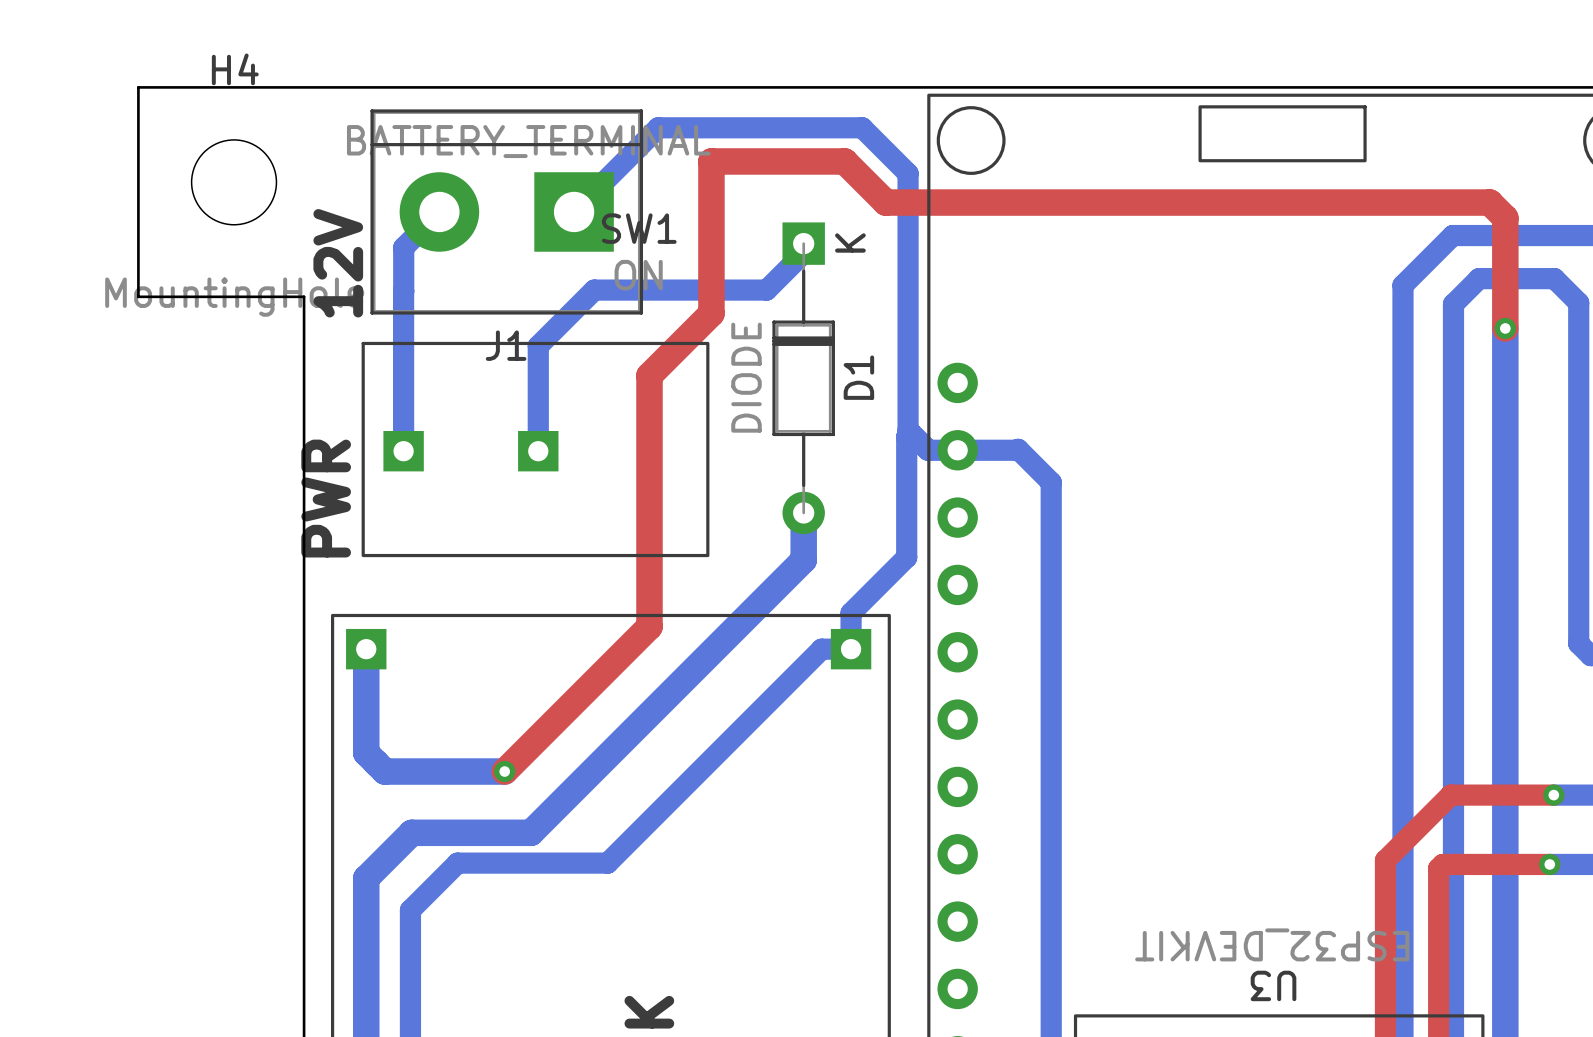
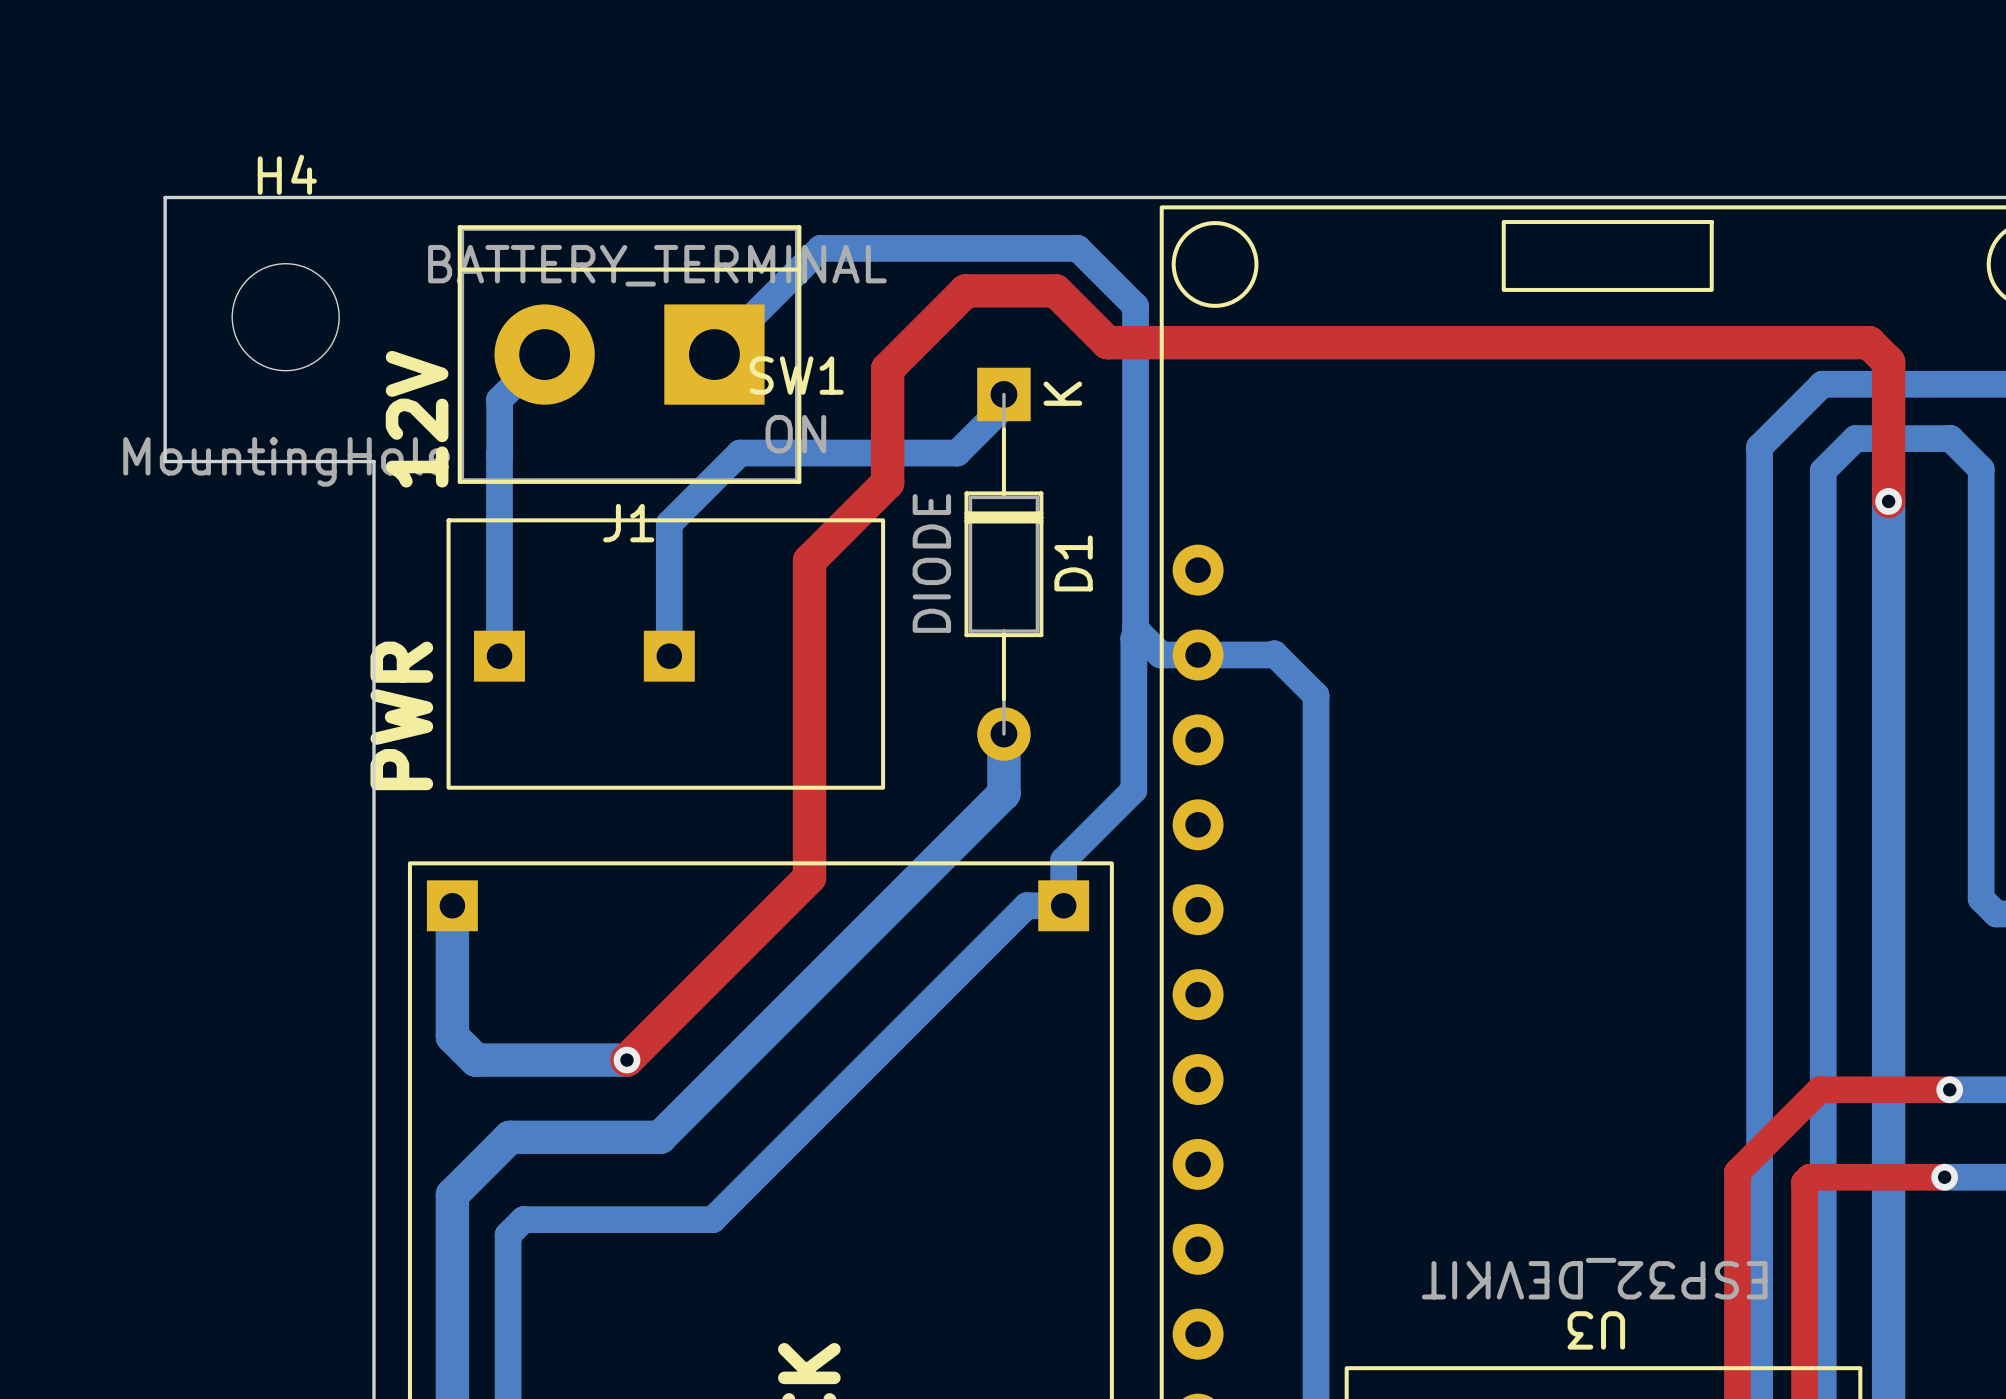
top track: (773, 161) (711, 161) (711, 223) -> (965, 290) (887, 368)
bottom track: (607, 863) (457, 863) (422, 898) -> (756, 1175) (712, 1219) (523, 1219)

